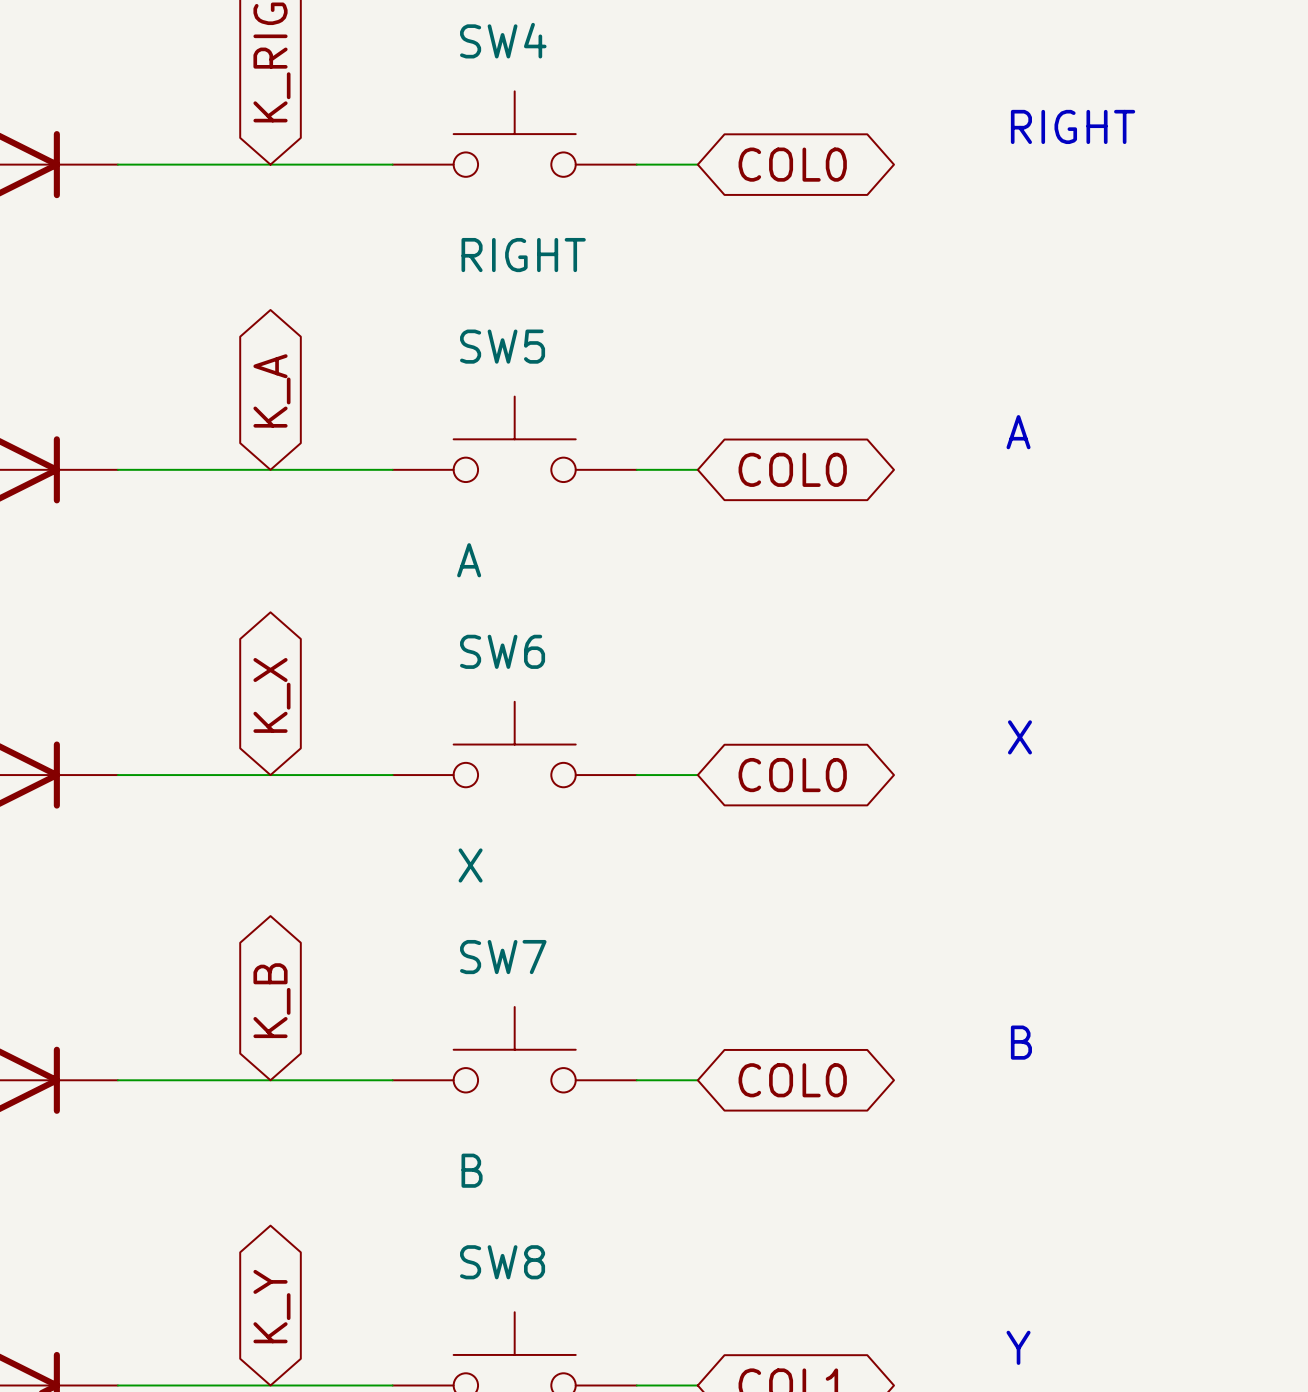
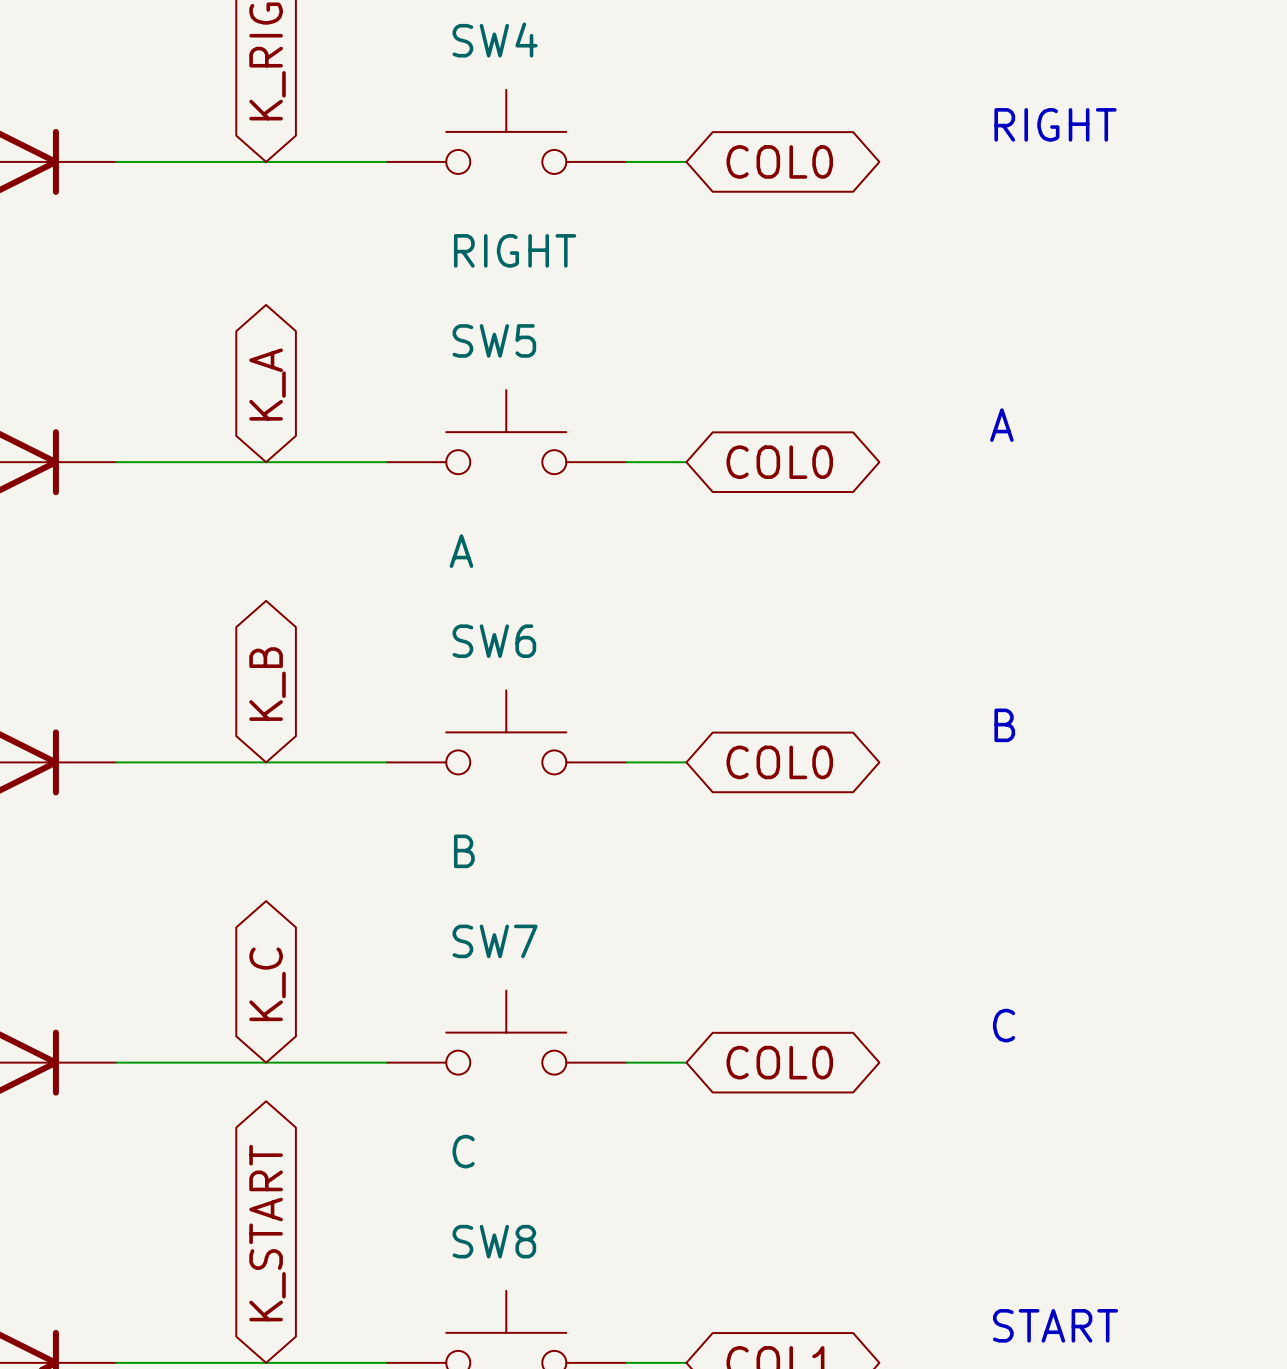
global label: K_X (271, 695) -> K_B (267, 684)
text: X (1019, 737) -> B (1004, 725)
SW6 value: X (470, 865) -> B (464, 851)
global label: K_B (271, 1000) -> K_C (267, 984)
text: B (1021, 1042) -> C (1004, 1025)
SW7 value: B (472, 1170) -> C (463, 1151)
global label: K_Y (271, 1306) -> K_START (267, 1233)
text: Y (1018, 1347) -> START (1055, 1325)

